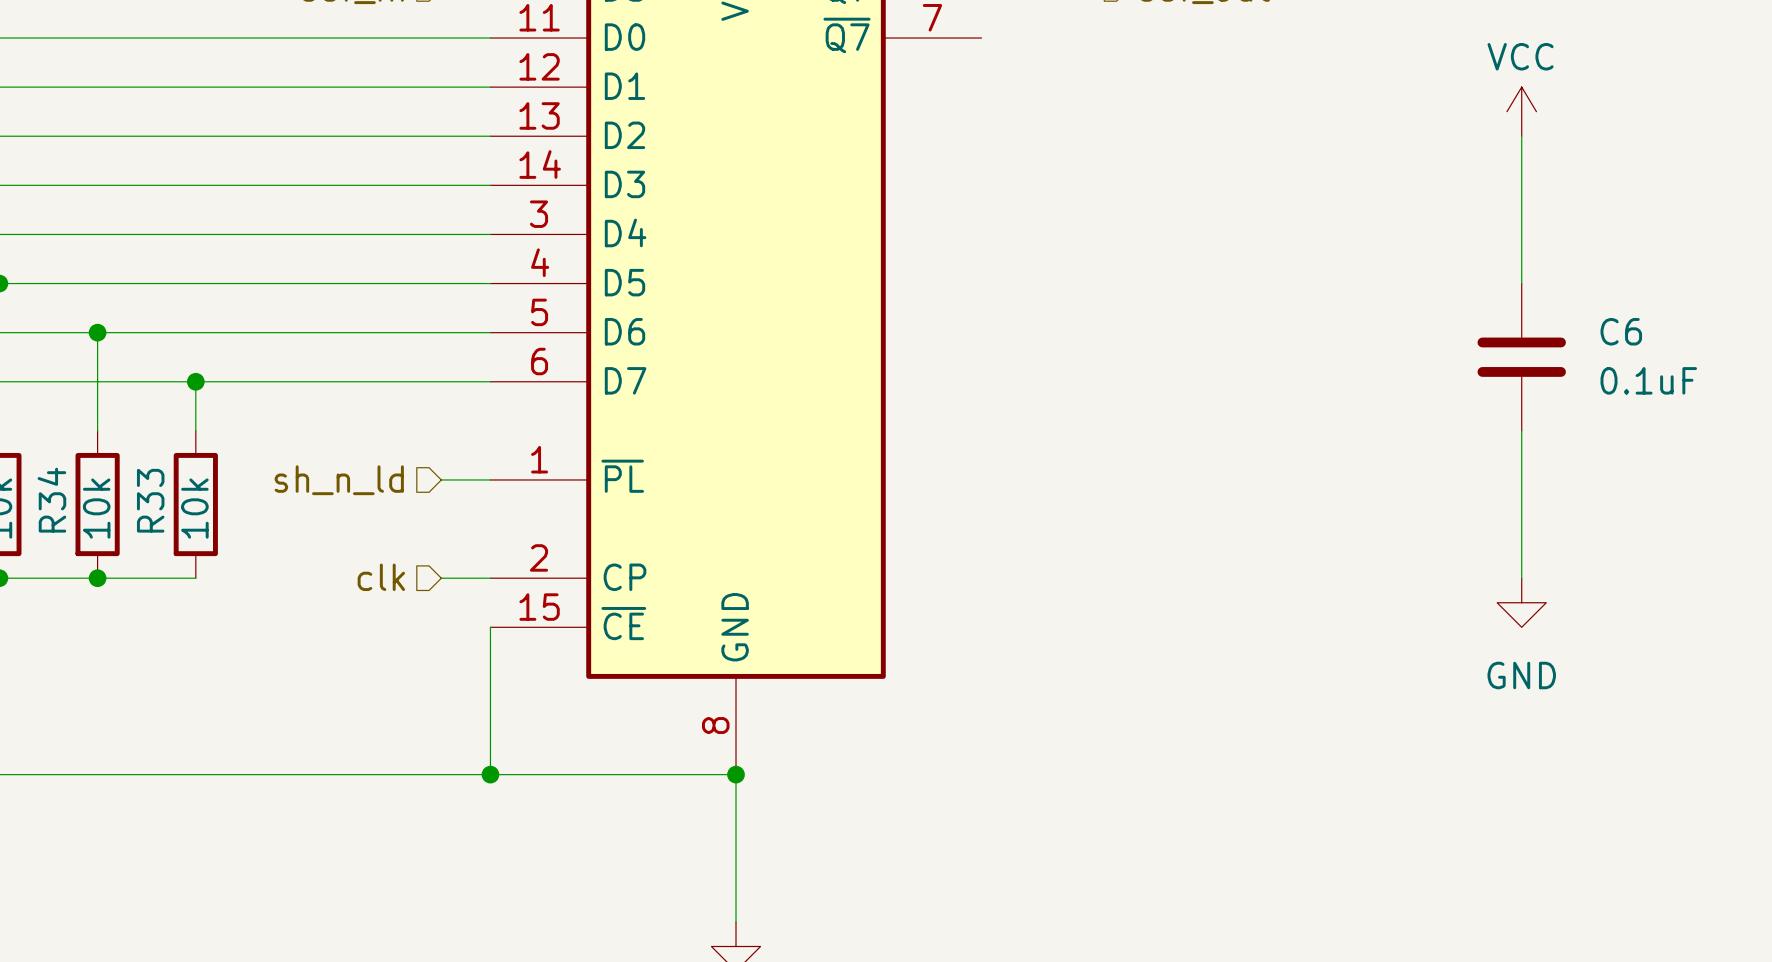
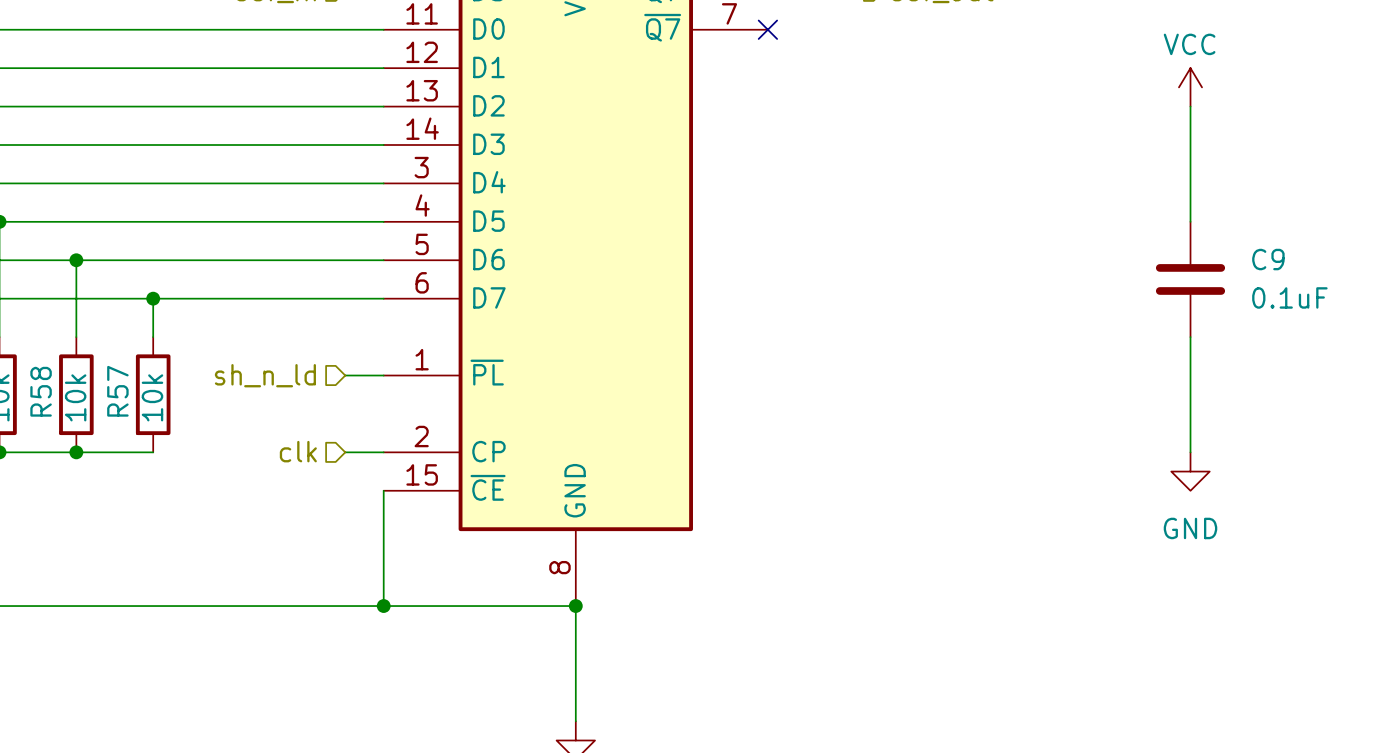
no-connect mark: none -> (767, 29)
C6 name: C6 (1621, 331) -> C9 (1268, 259)
R34 name: R34 (51, 500) -> R58 (41, 391)
R33 name: R33 (150, 500) -> R57 (117, 391)

